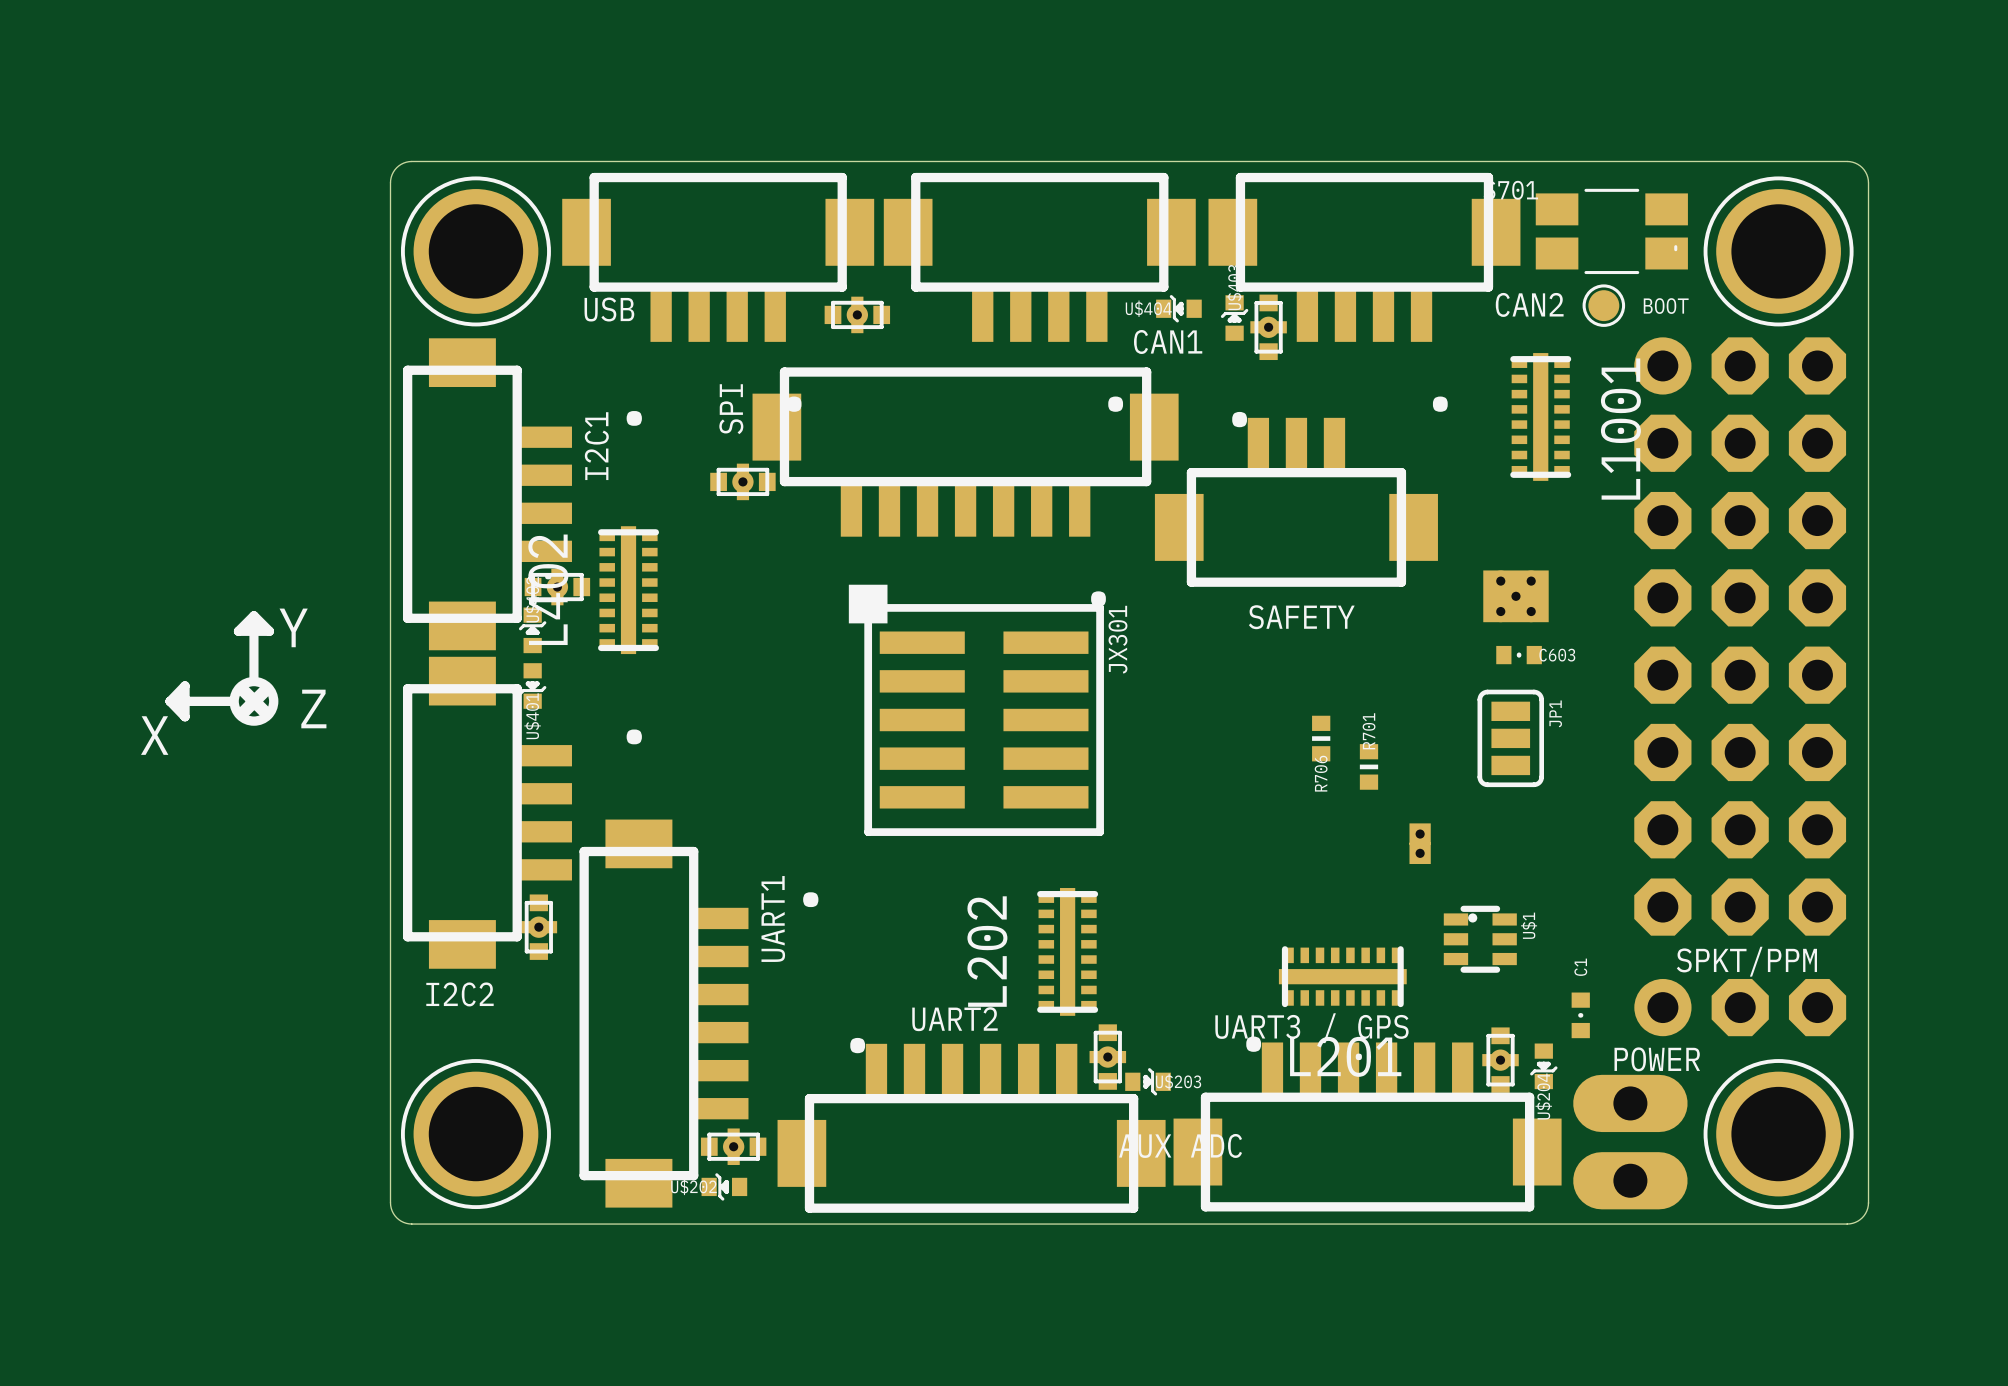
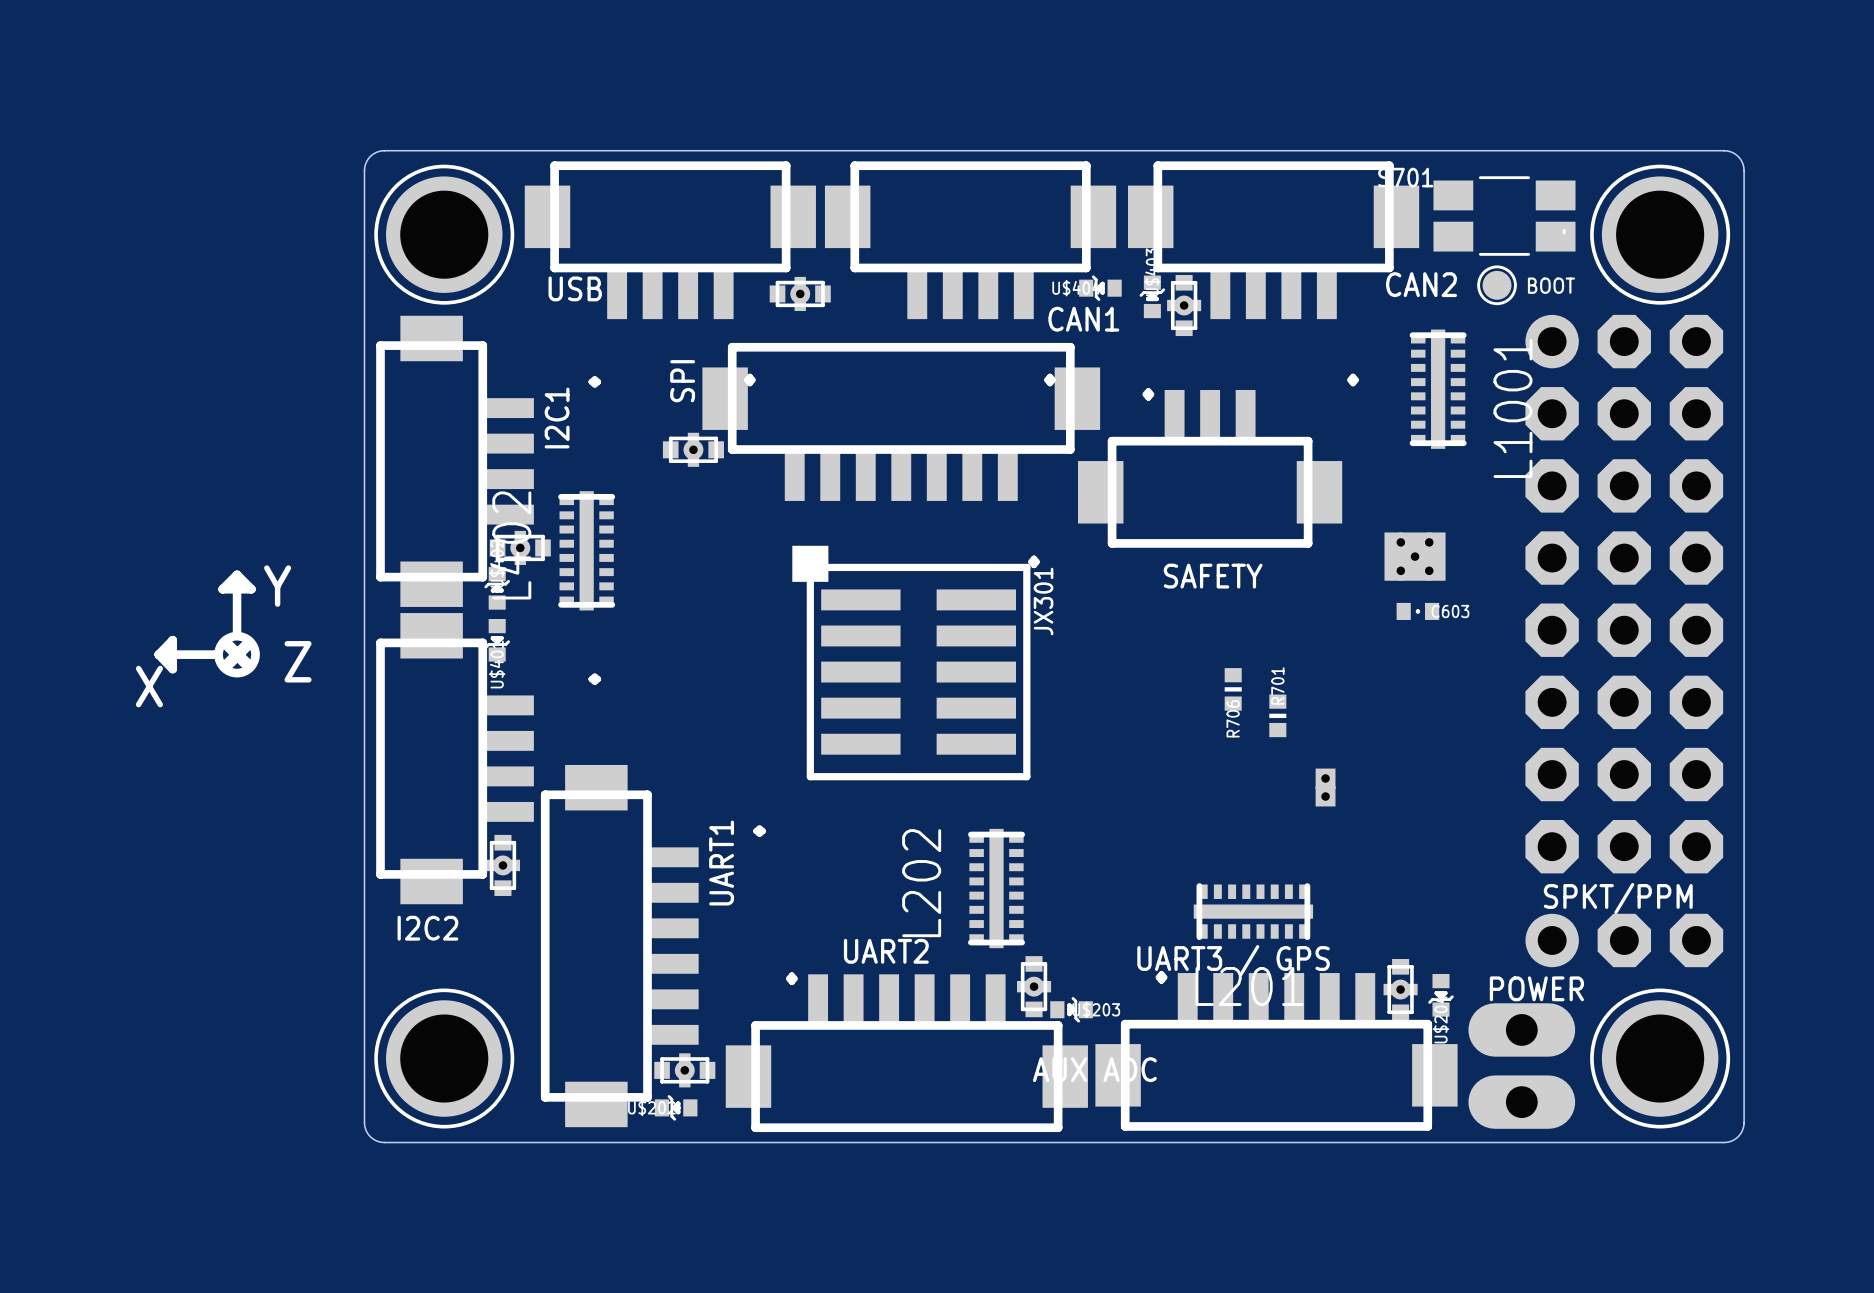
JP1: (1510, 738) -> none
U$1: (1480, 939) -> none
C1: (1580, 1015) -> none

